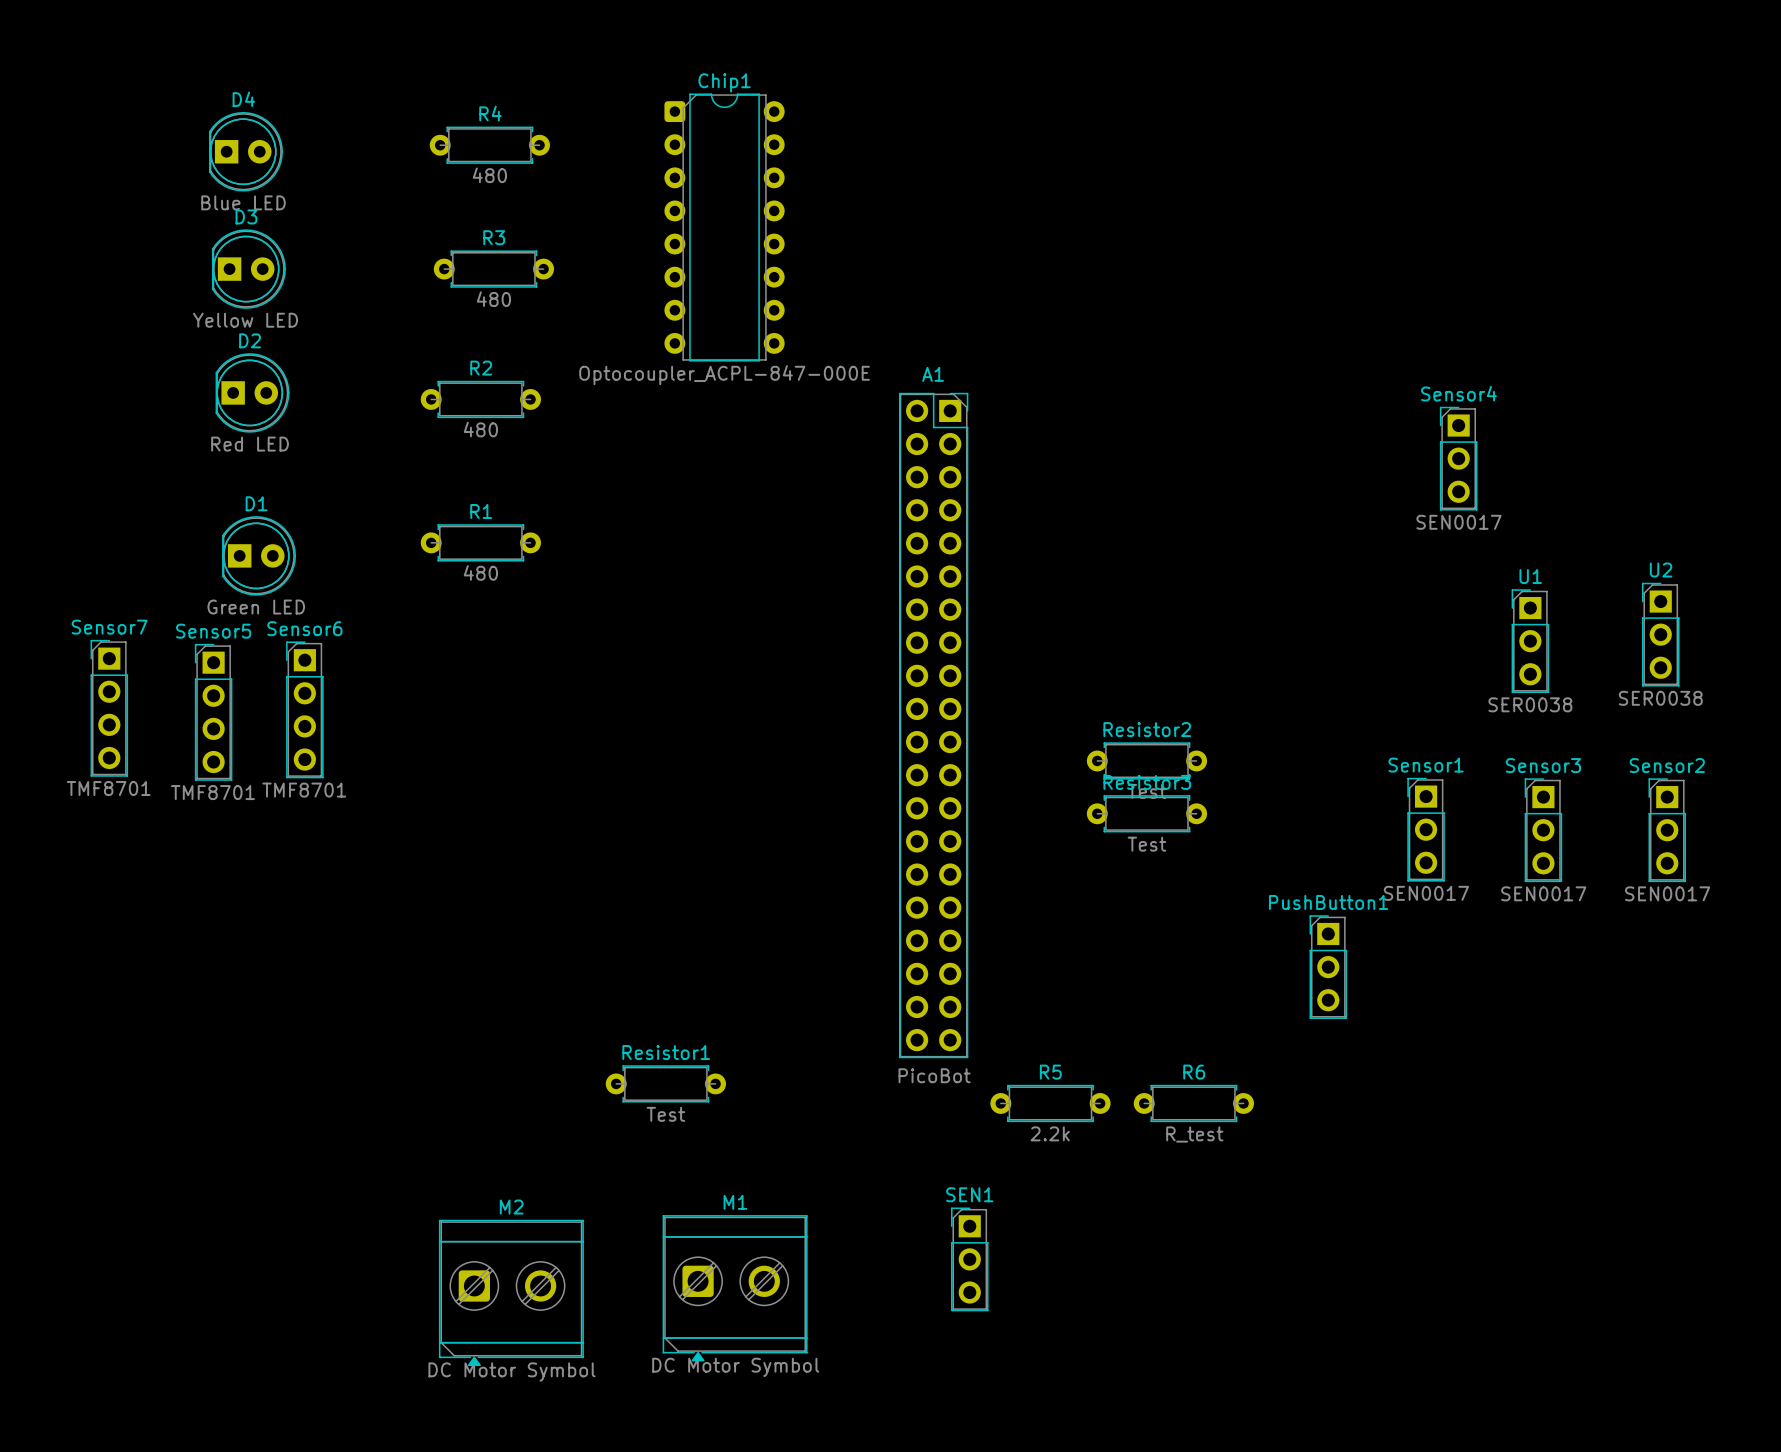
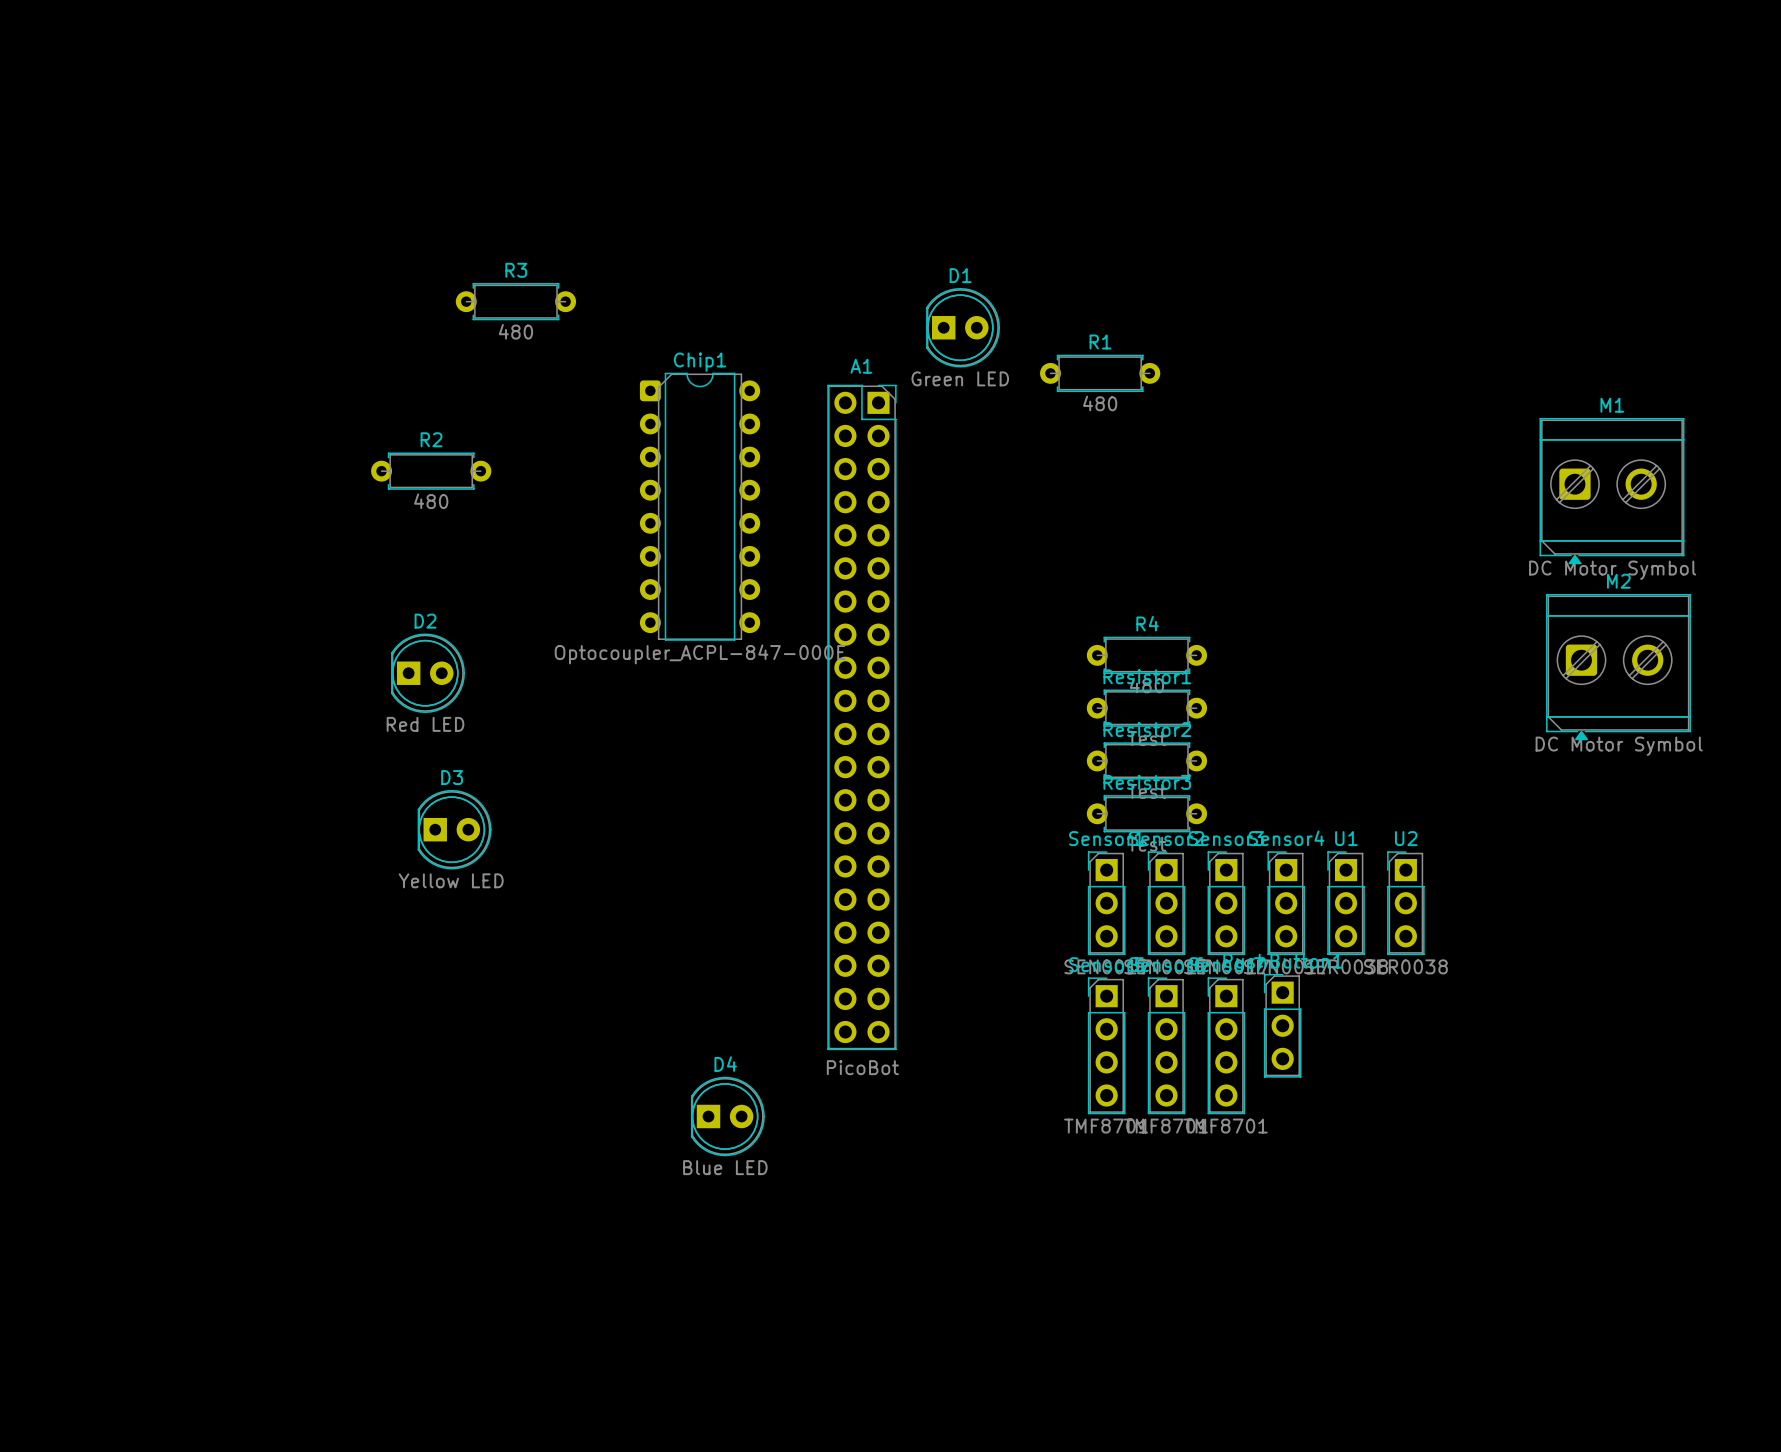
R4 position: (489, 145) -> (1146, 655)
D4 position: (246, 151) -> (727, 1116)
Chip1 position: (724, 227) -> (700, 506)
D3 position: (248, 269) -> (454, 829)
R3 position: (493, 269) -> (515, 301)
D2 position: (252, 392) -> (428, 673)
R2 position: (480, 399) -> (431, 471)
Sensor4 position: (1458, 458) -> (1286, 903)
R1 position: (480, 542) -> (1100, 373)
D1 position: (259, 555) -> (963, 327)
U2 position: (1660, 634) -> (1405, 903)
U1 position: (1530, 641) -> (1346, 903)
Sensor7 position: (109, 708) -> (1226, 1045)
Sensor6 position: (304, 709) -> (1166, 1045)
Sensor5 position: (213, 712) -> (1106, 1045)
A1 position: (933, 725) -> (861, 717)
Sensor1 position: (1426, 829) -> (1106, 903)
Sensor3 position: (1543, 830) -> (1226, 903)
Sensor2 position: (1667, 830) -> (1166, 903)
PushButton1 position: (1328, 967) -> (1282, 1025)
Resistor1 position: (665, 1083) -> (1146, 708)
R5: 2.2k (1050, 1103) -> none
R6: R_test (1193, 1103) -> none
SEN1: (969, 1259) -> none
M1 position: (735, 1288) -> (1611, 491)
M2 position: (511, 1292) -> (1618, 667)

